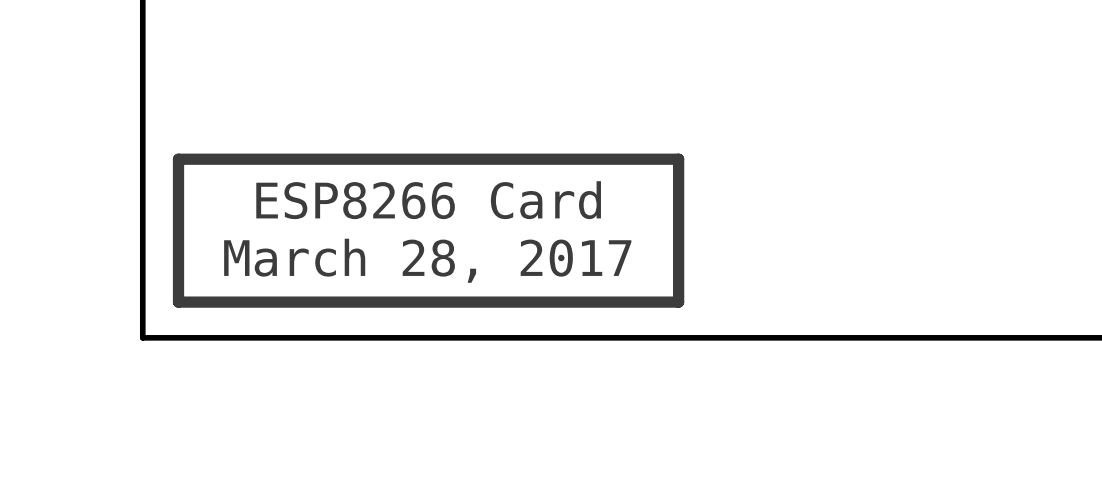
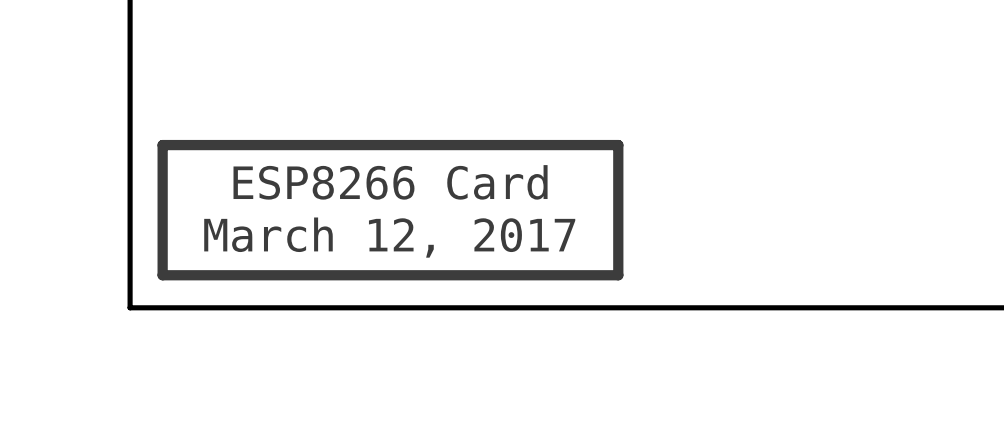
text: March 28, 2017 (427, 260) -> March 12, 2017 (389, 237)

